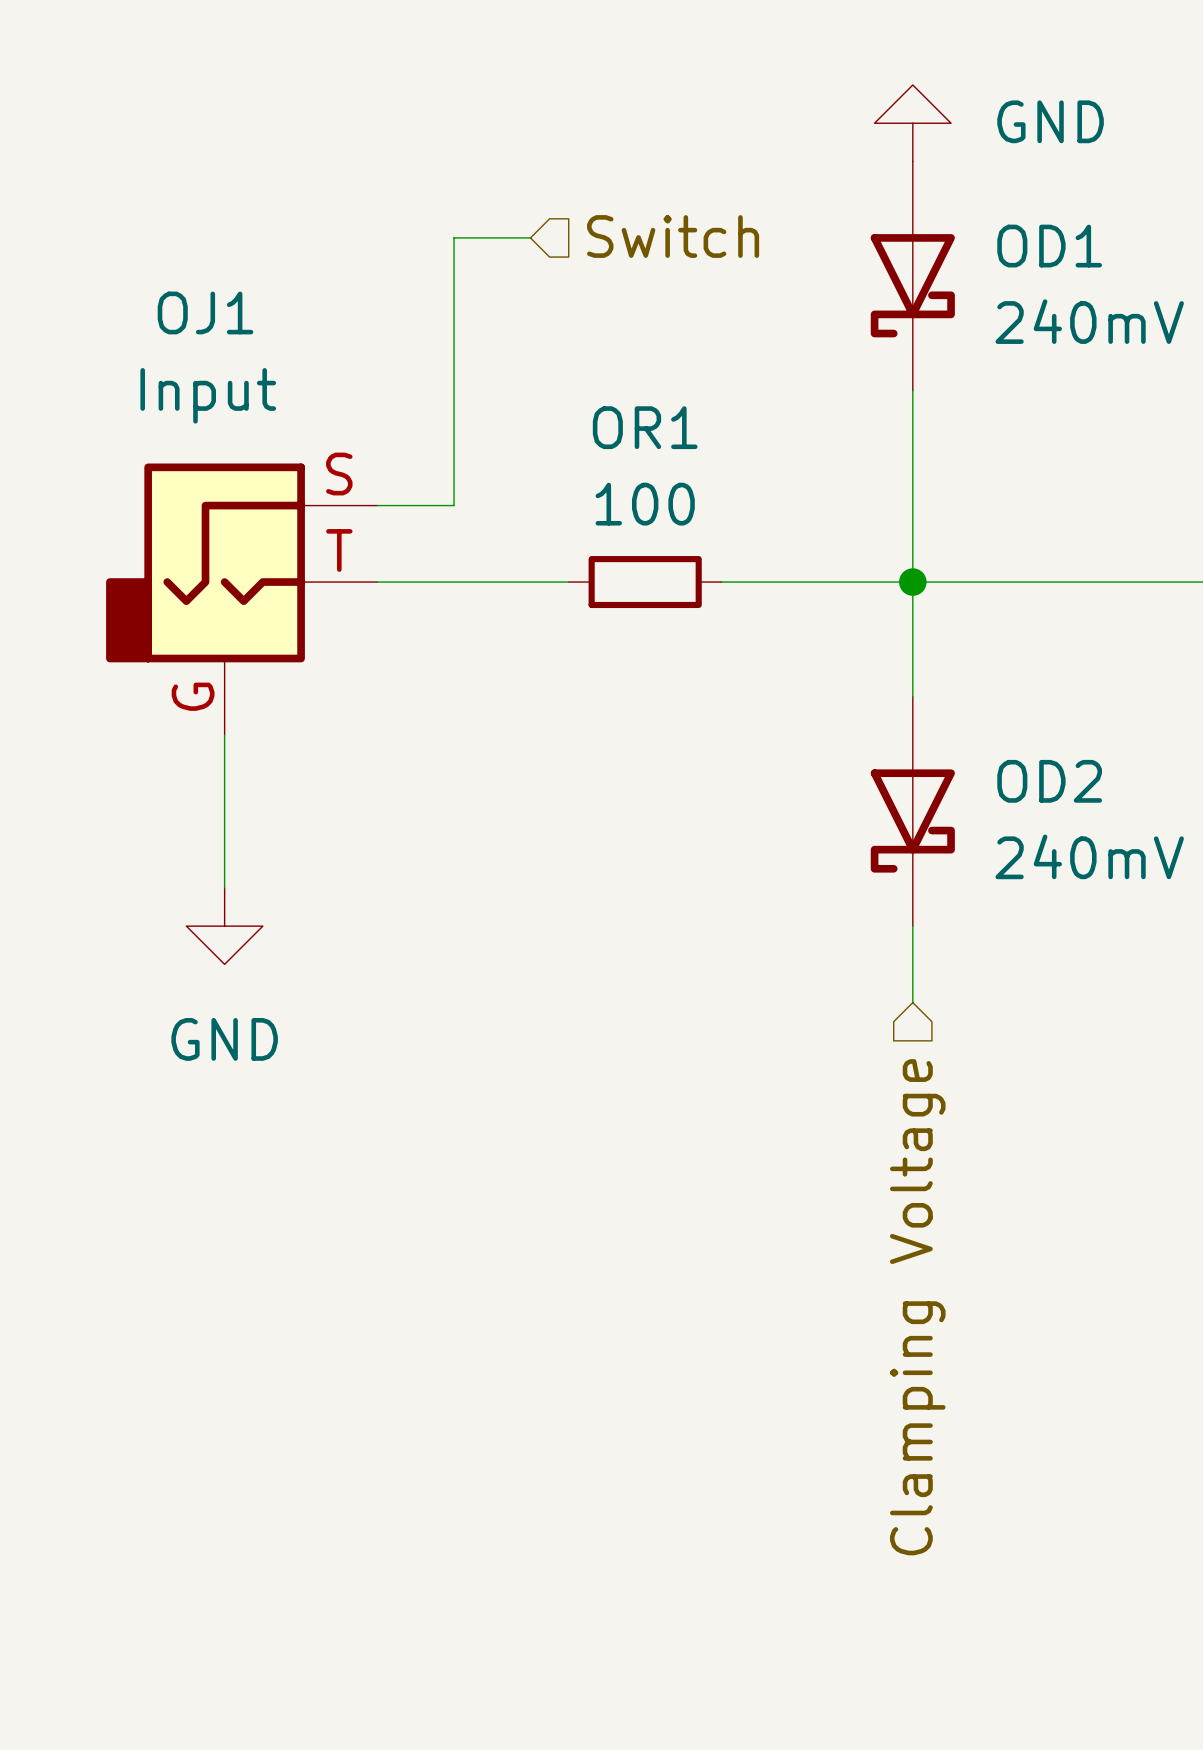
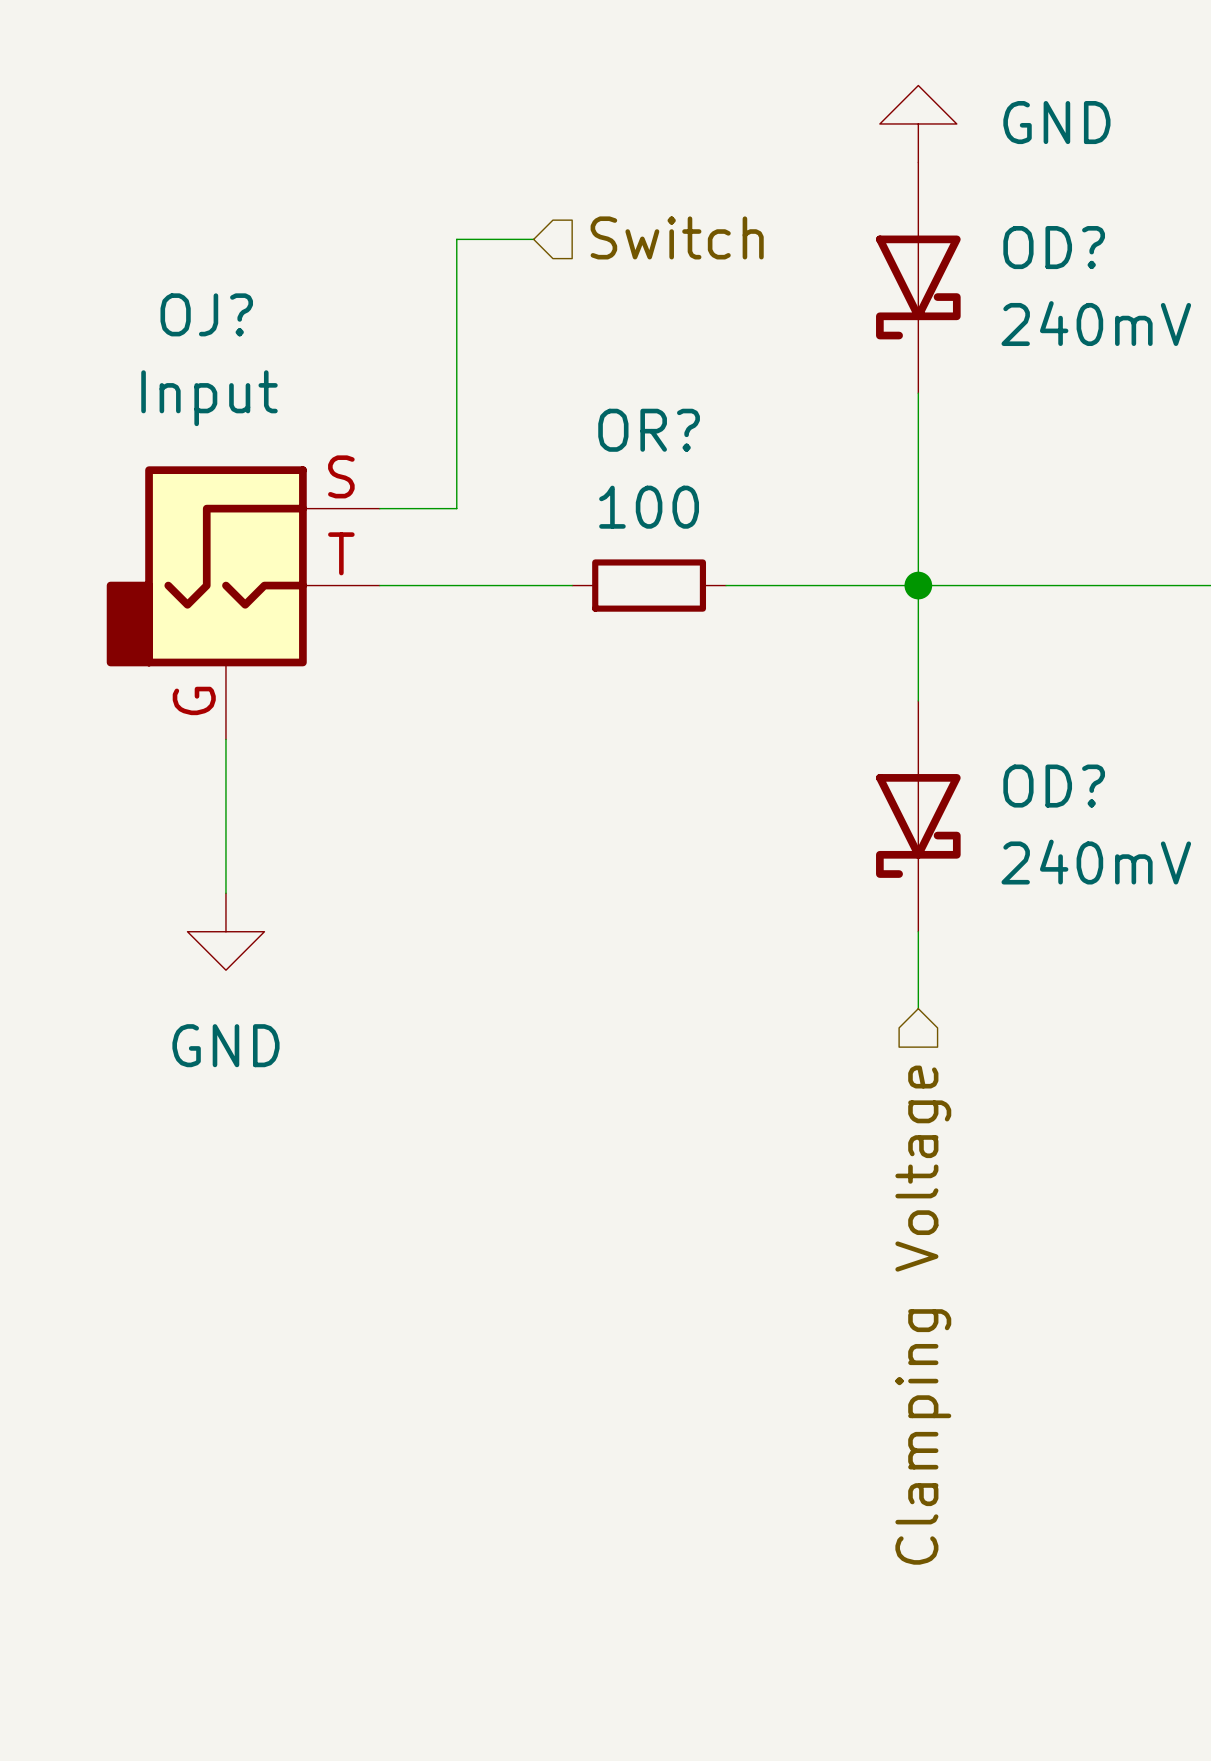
OD1 name: OD1 (1049, 246) -> OD? (1054, 247)
OJ1 name: OJ1 (205, 312) -> OJ? (206, 314)
OR1 name: OR1 (645, 427) -> OR? (649, 430)
OD2 name: OD2 (1049, 781) -> OD? (1054, 786)

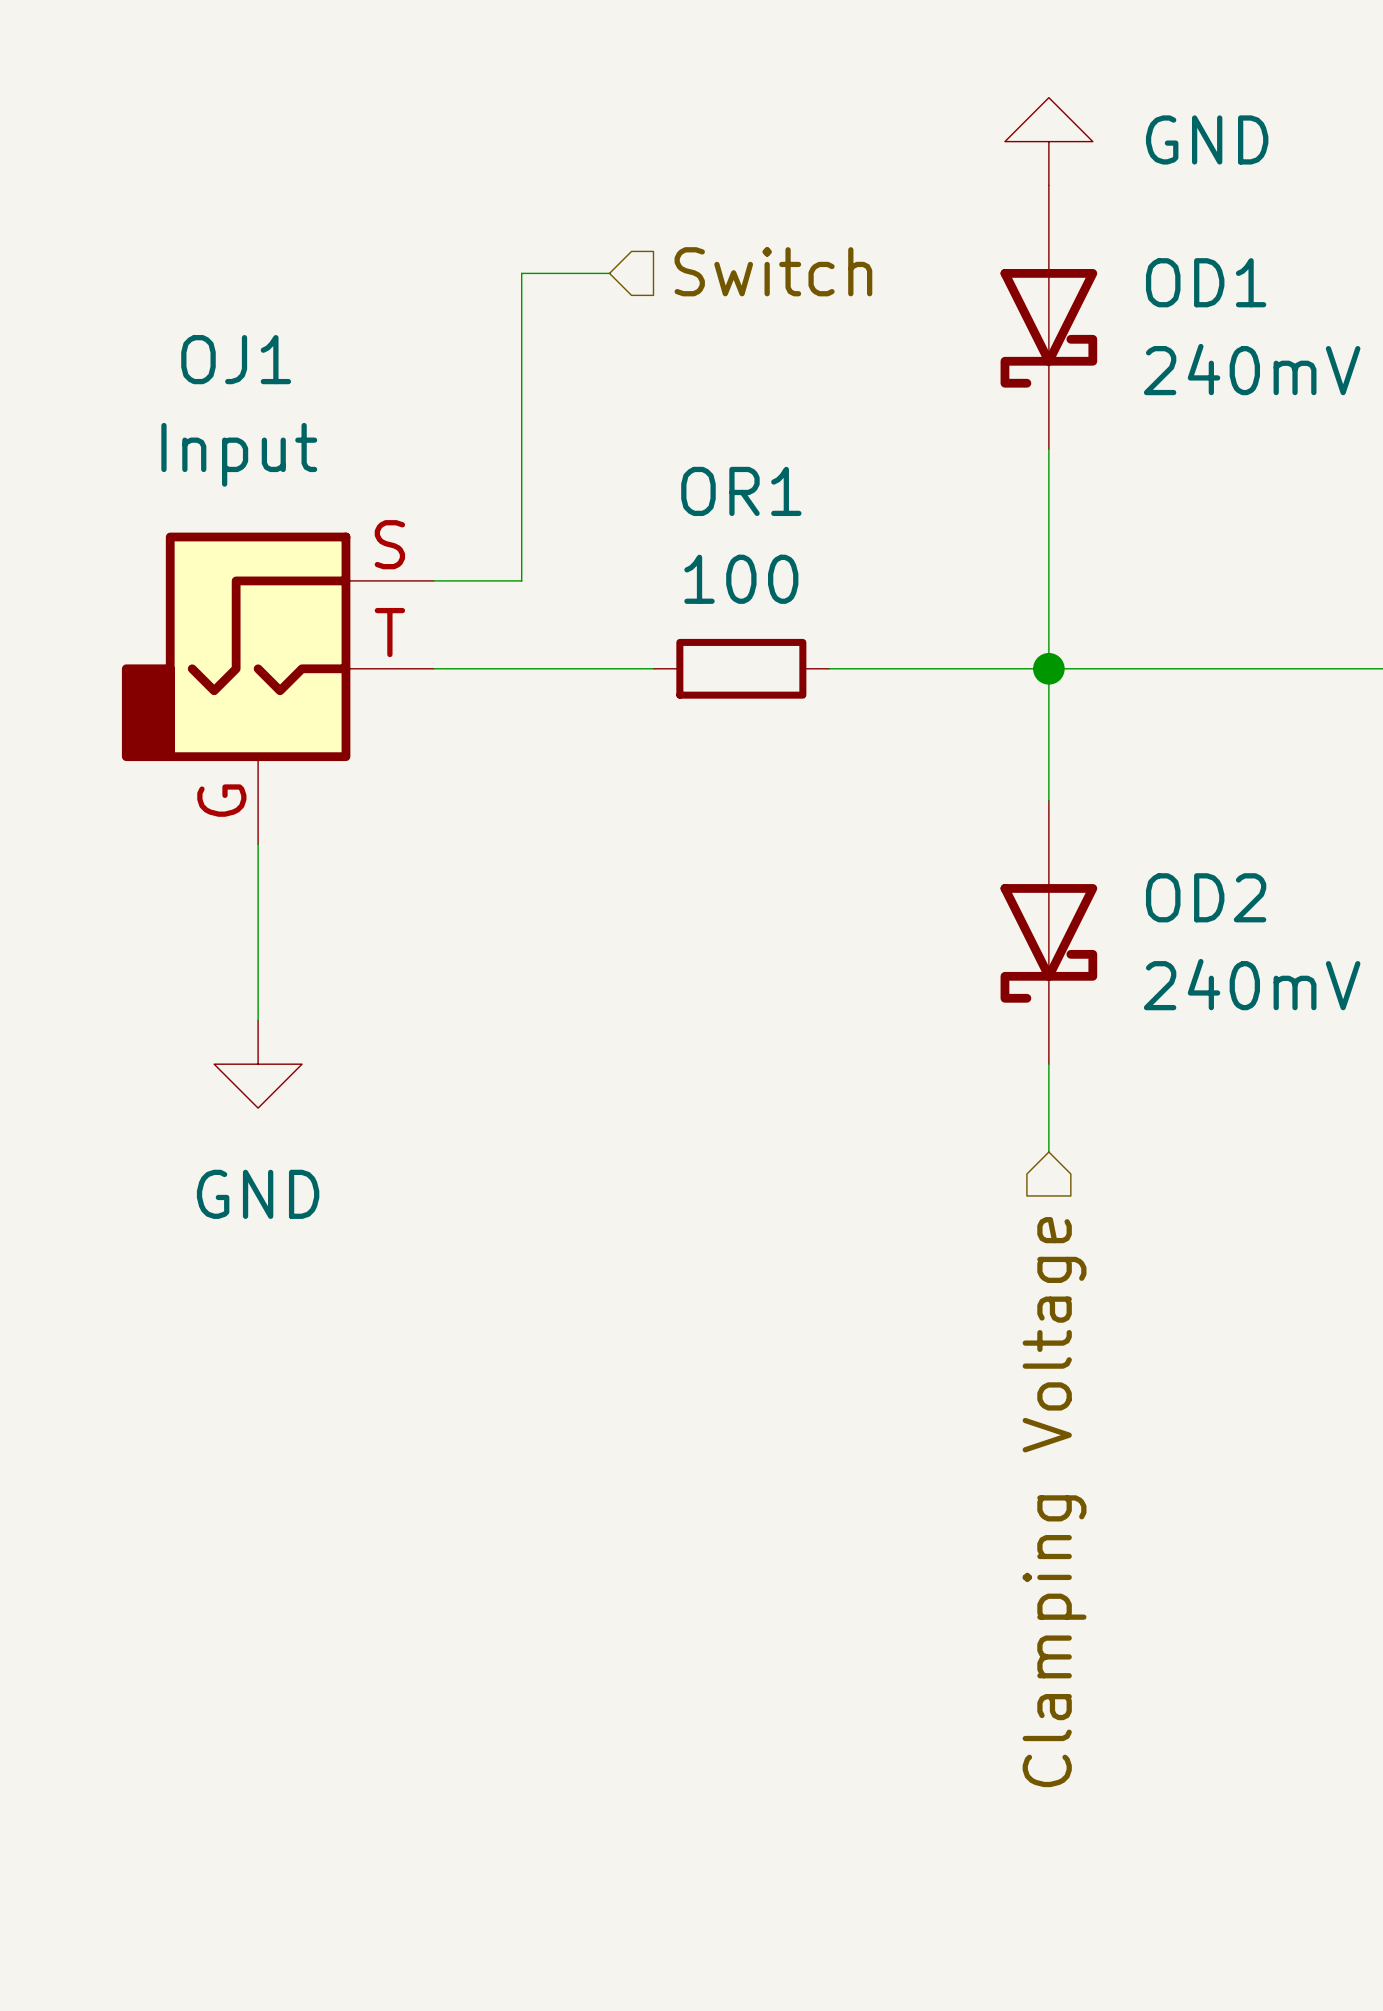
OD? name: OD? (1054, 247) -> OD1 (1206, 282)
OJ? name: OJ? (206, 314) -> OJ1 (236, 359)
OR? name: OR? (649, 430) -> OR1 (741, 491)
OD? name: OD? (1054, 786) -> OD2 (1206, 897)

